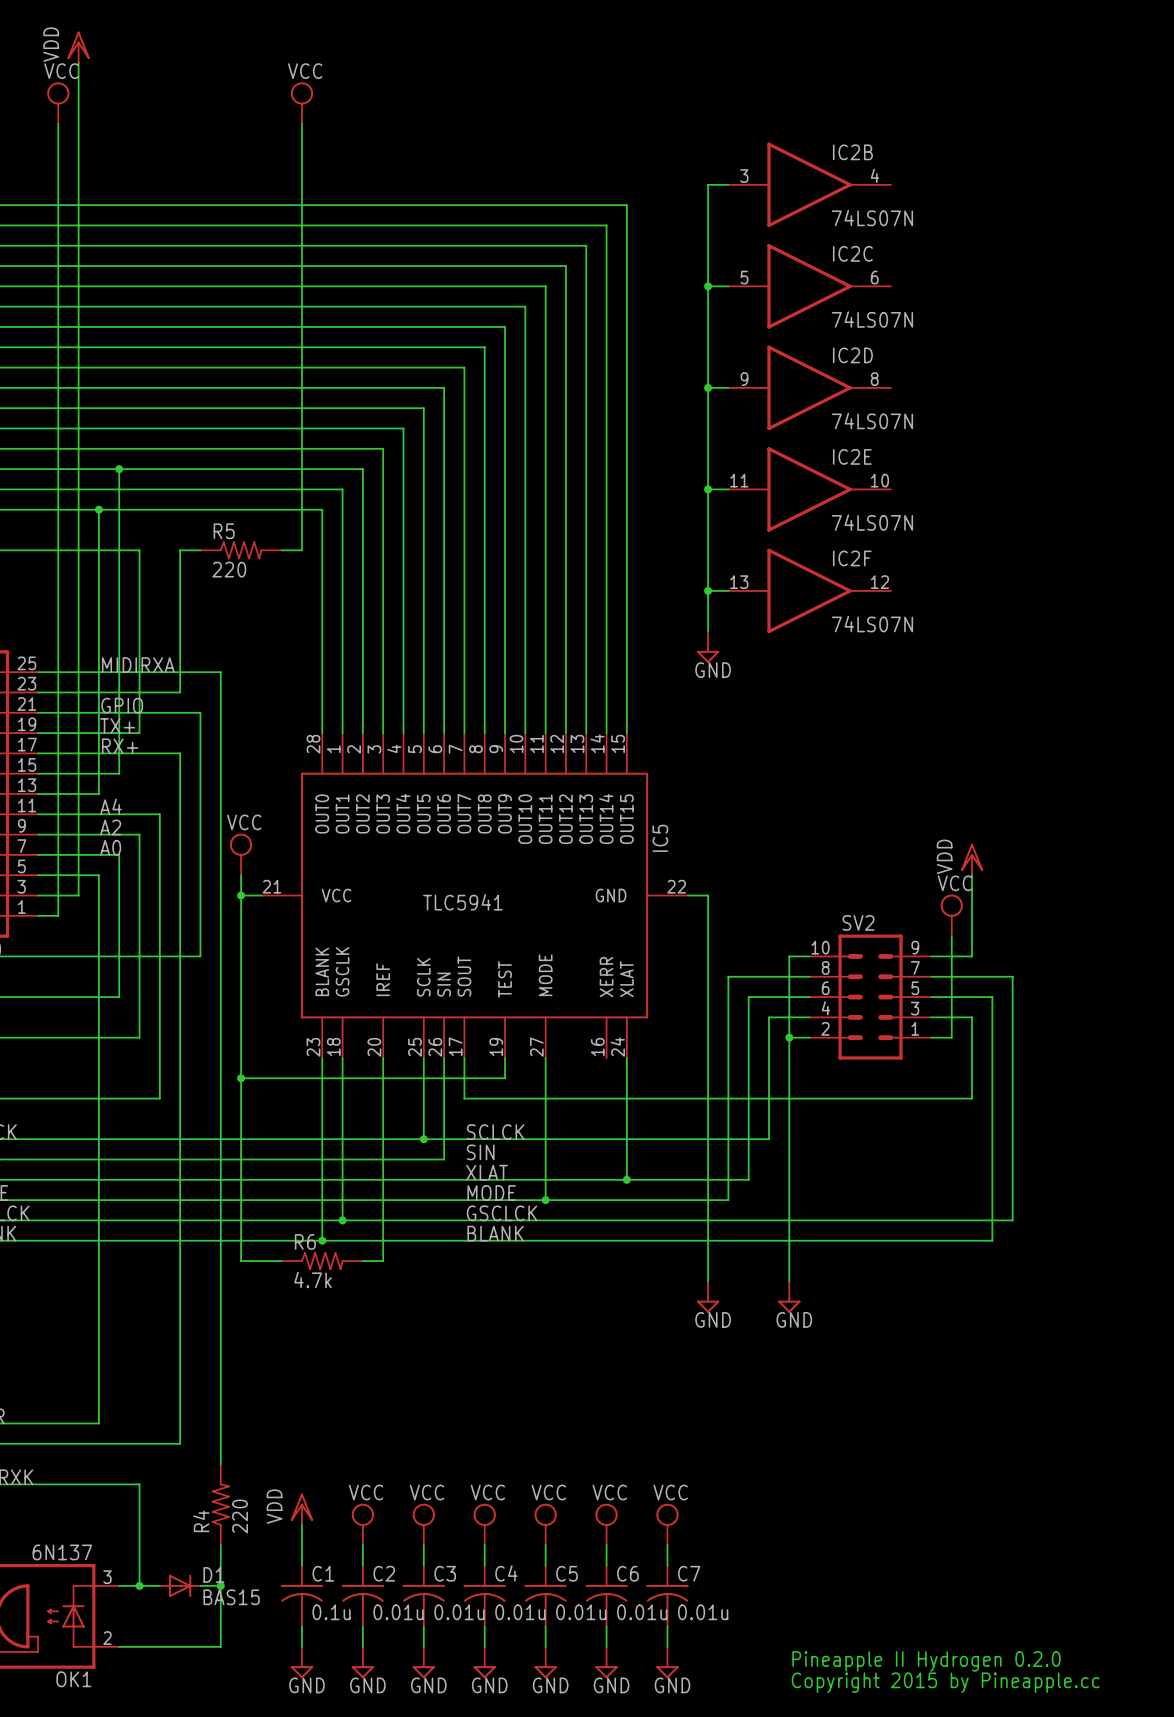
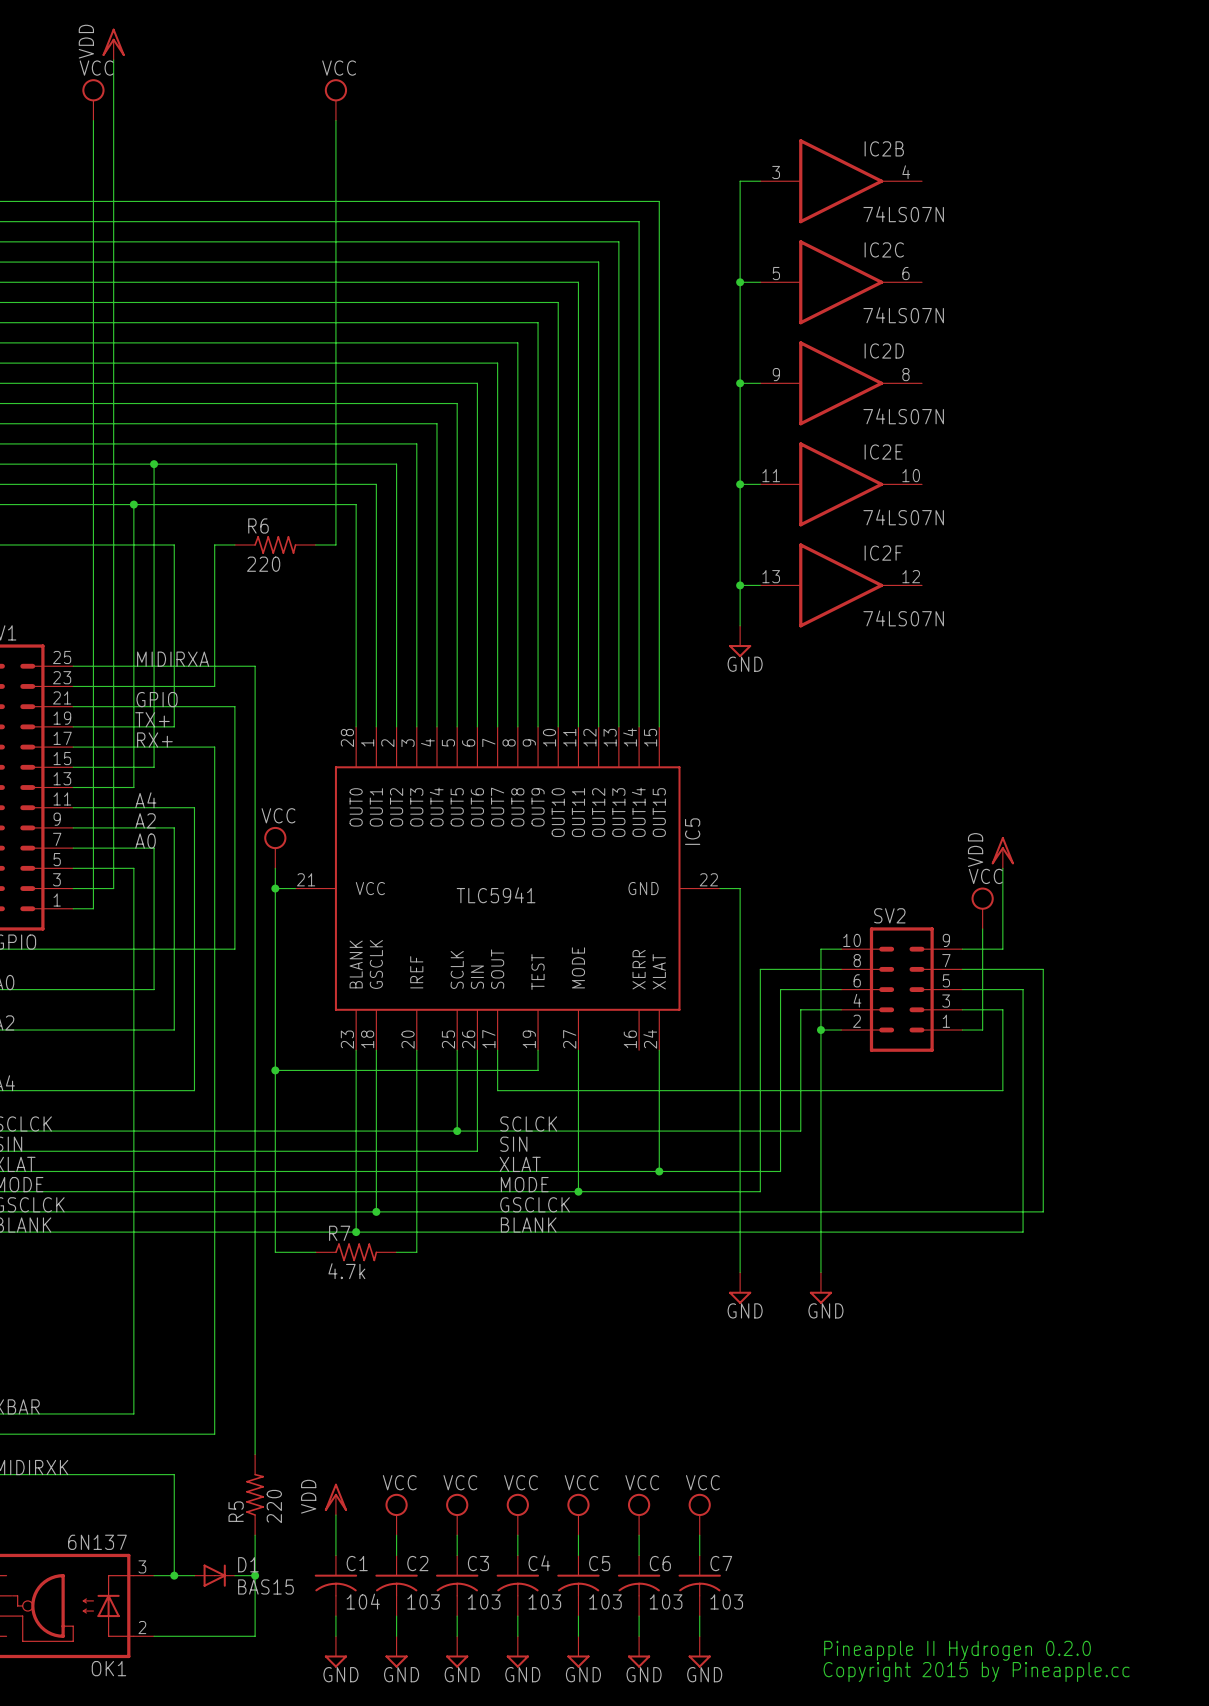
R5 name: R5 (224, 531) -> R6 (258, 525)
R6 name: R6 (305, 1241) -> R7 (339, 1233)
R4 name: R4 (201, 1521) -> R5 (236, 1511)
C1 value: 0.1u (331, 1612) -> 104 (363, 1601)
C2 value: 0.01u (398, 1612) -> 103 (423, 1601)
C3 value: 0.01u (459, 1612) -> 103 (484, 1601)
C4 value: 0.01u (520, 1612) -> 103 (544, 1601)
C5 value: 0.01u (581, 1612) -> 103 (605, 1601)
C6 value: 0.01u (642, 1612) -> 103 (666, 1601)
C7 value: 0.01u (703, 1612) -> 103 (726, 1601)

